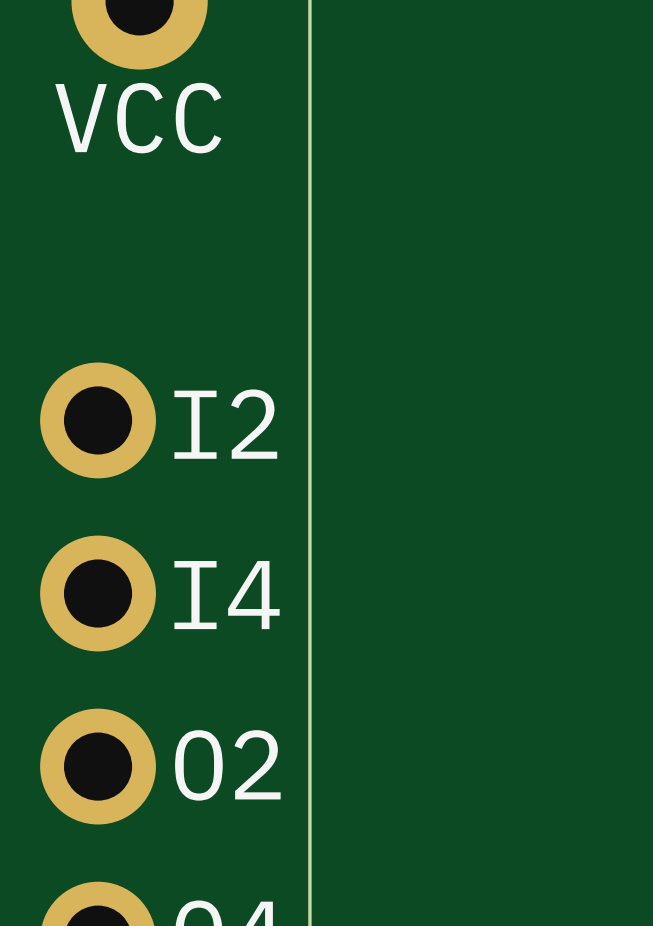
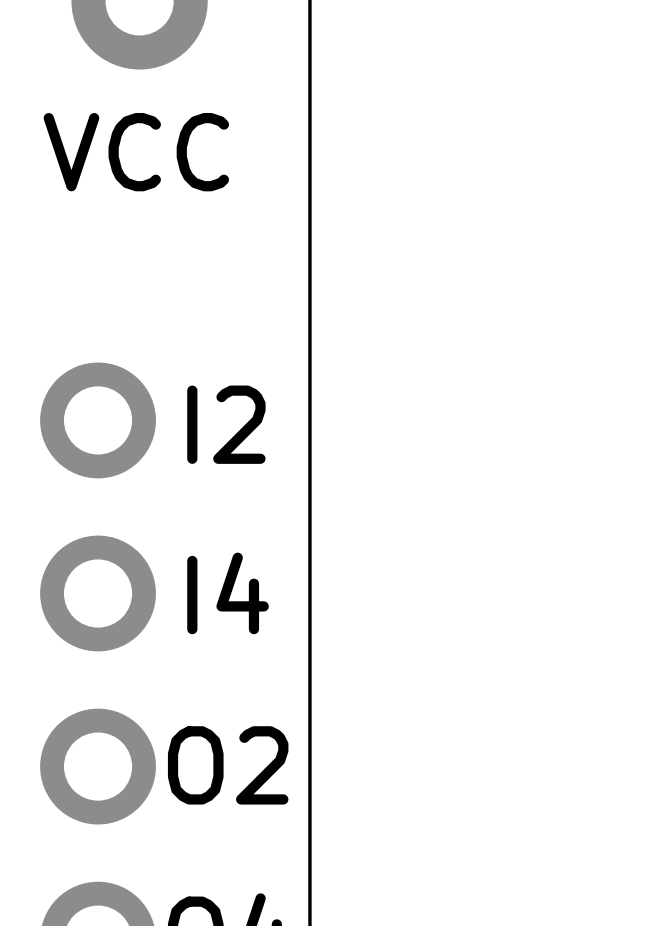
text position: VCC (138, 118) -> VCC (136, 152)

